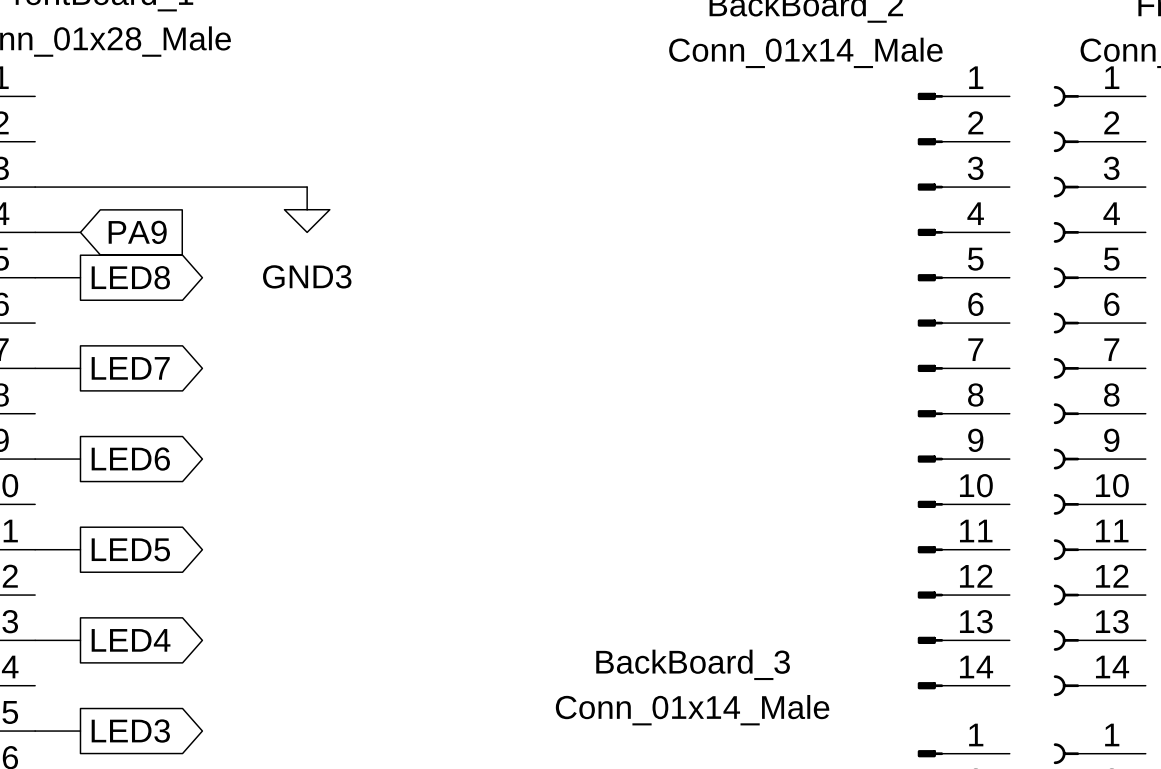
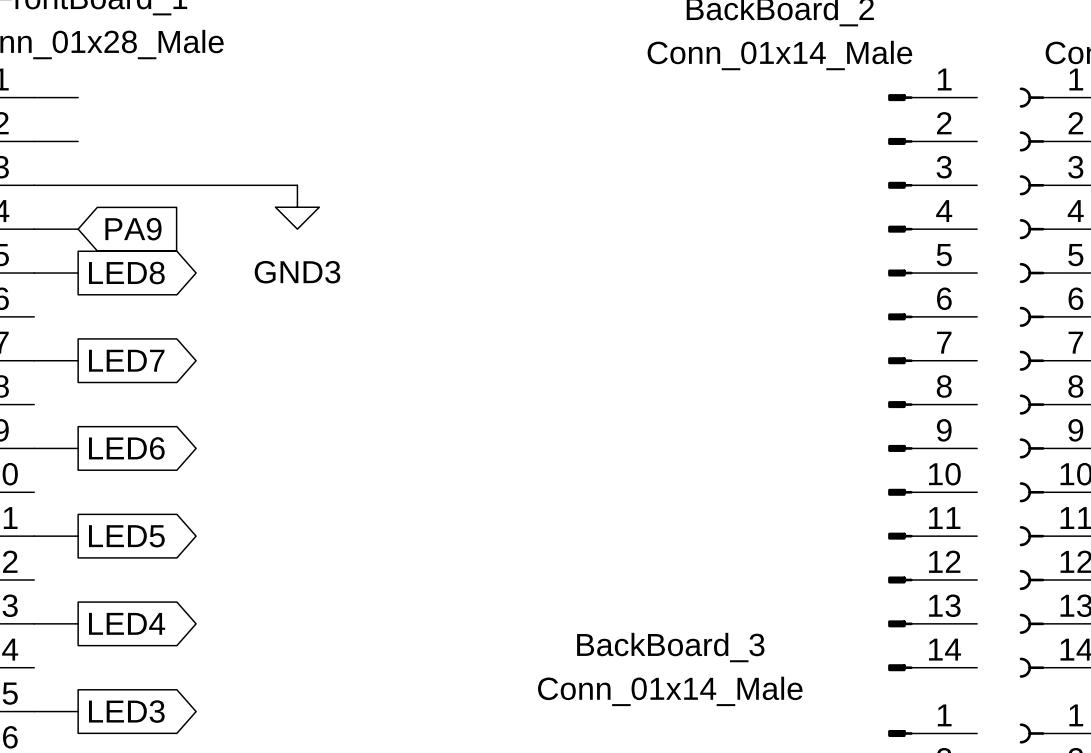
wire: none -> (34, 97) (78, 97)
wire: none -> (34, 141) (78, 141)

